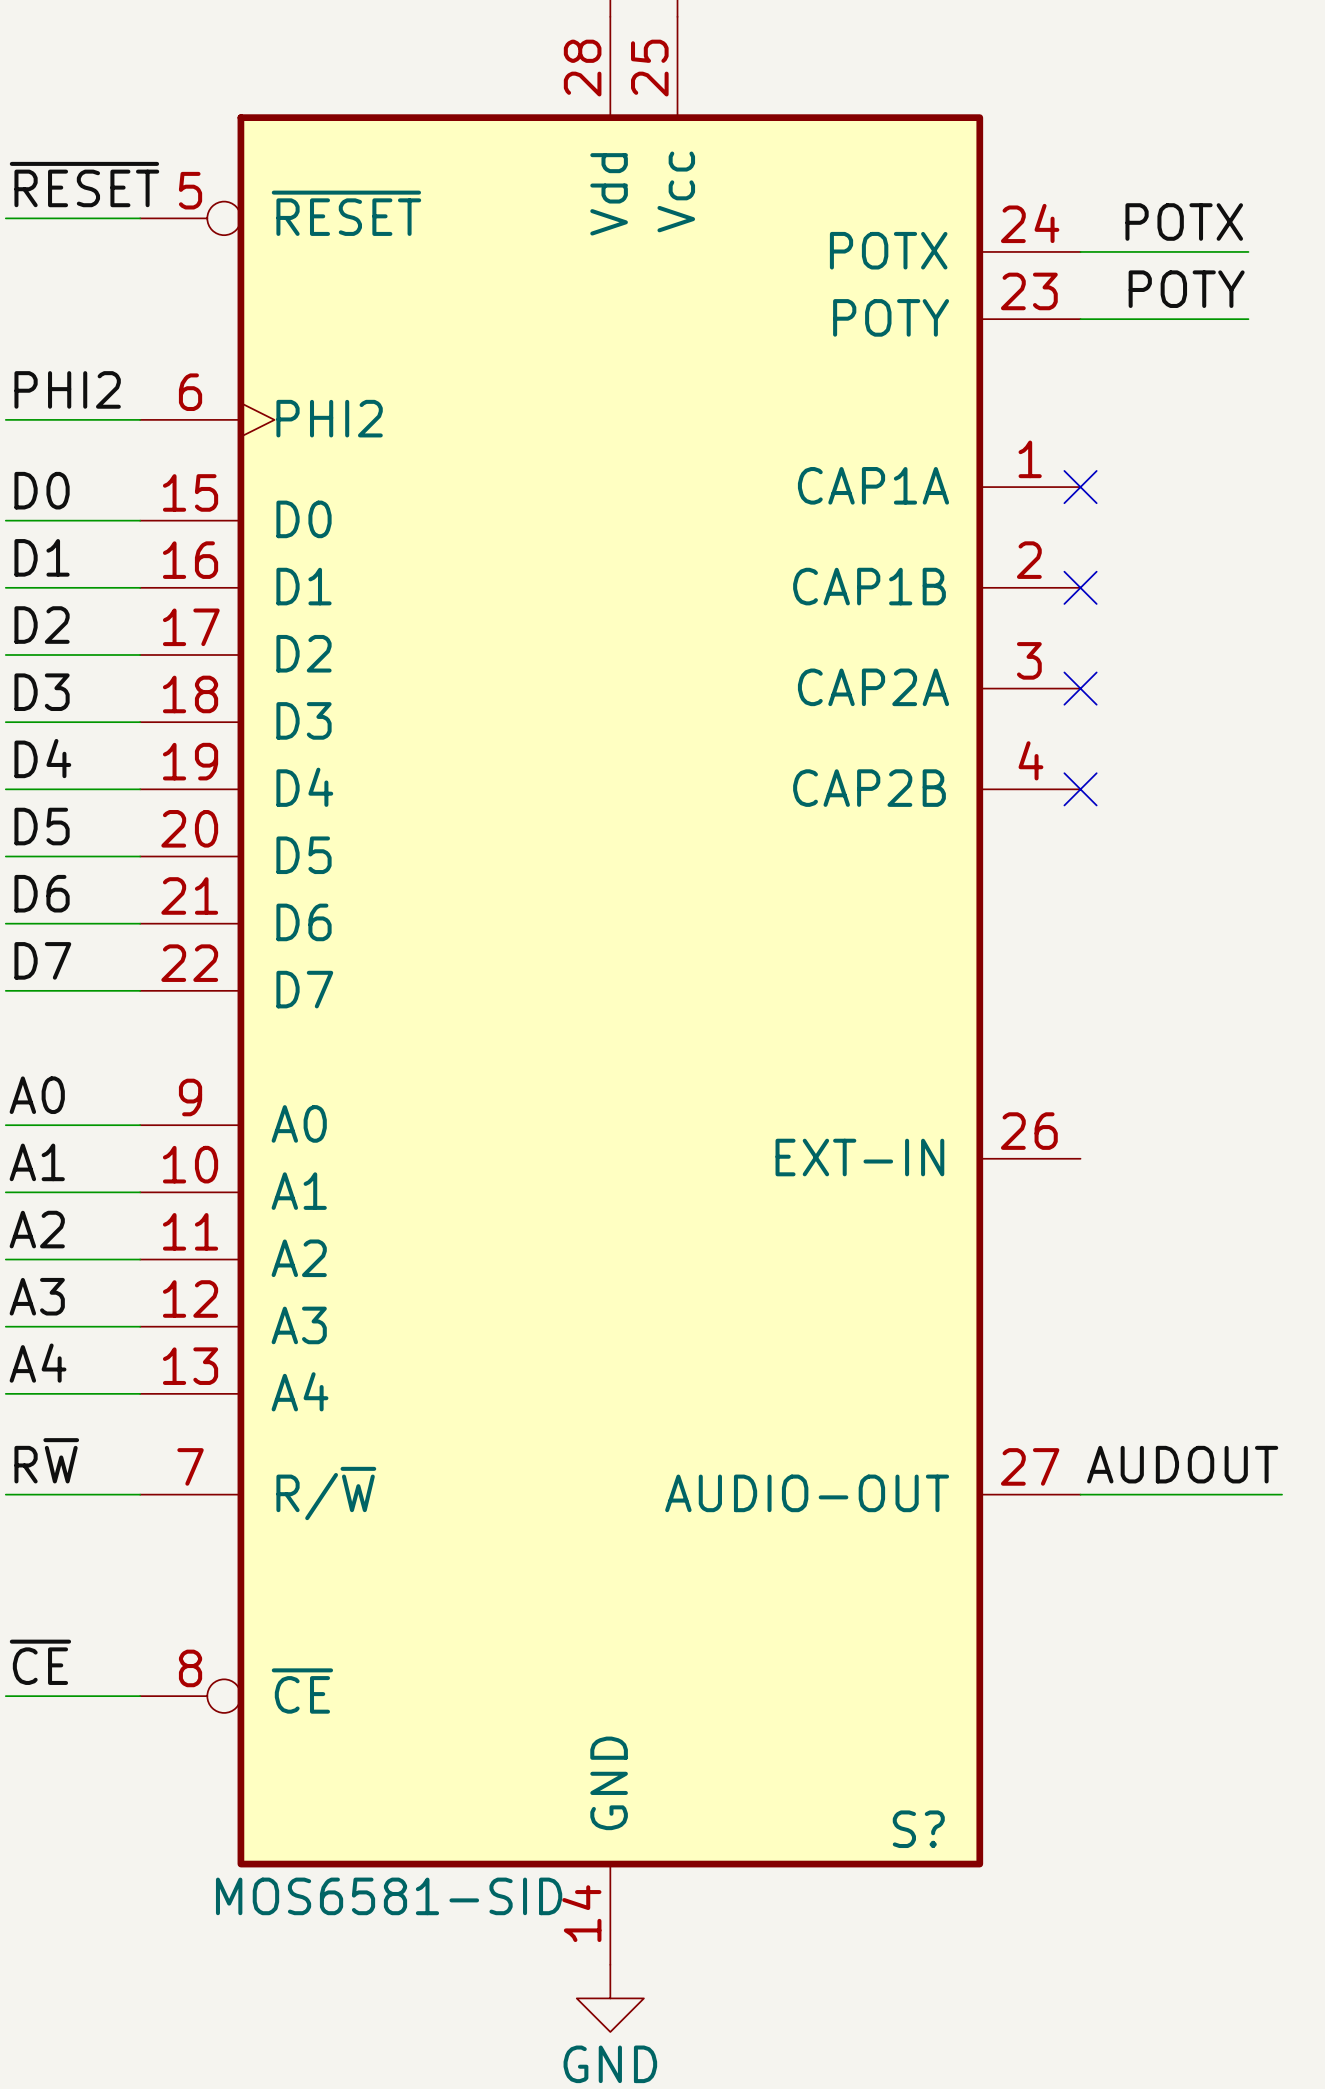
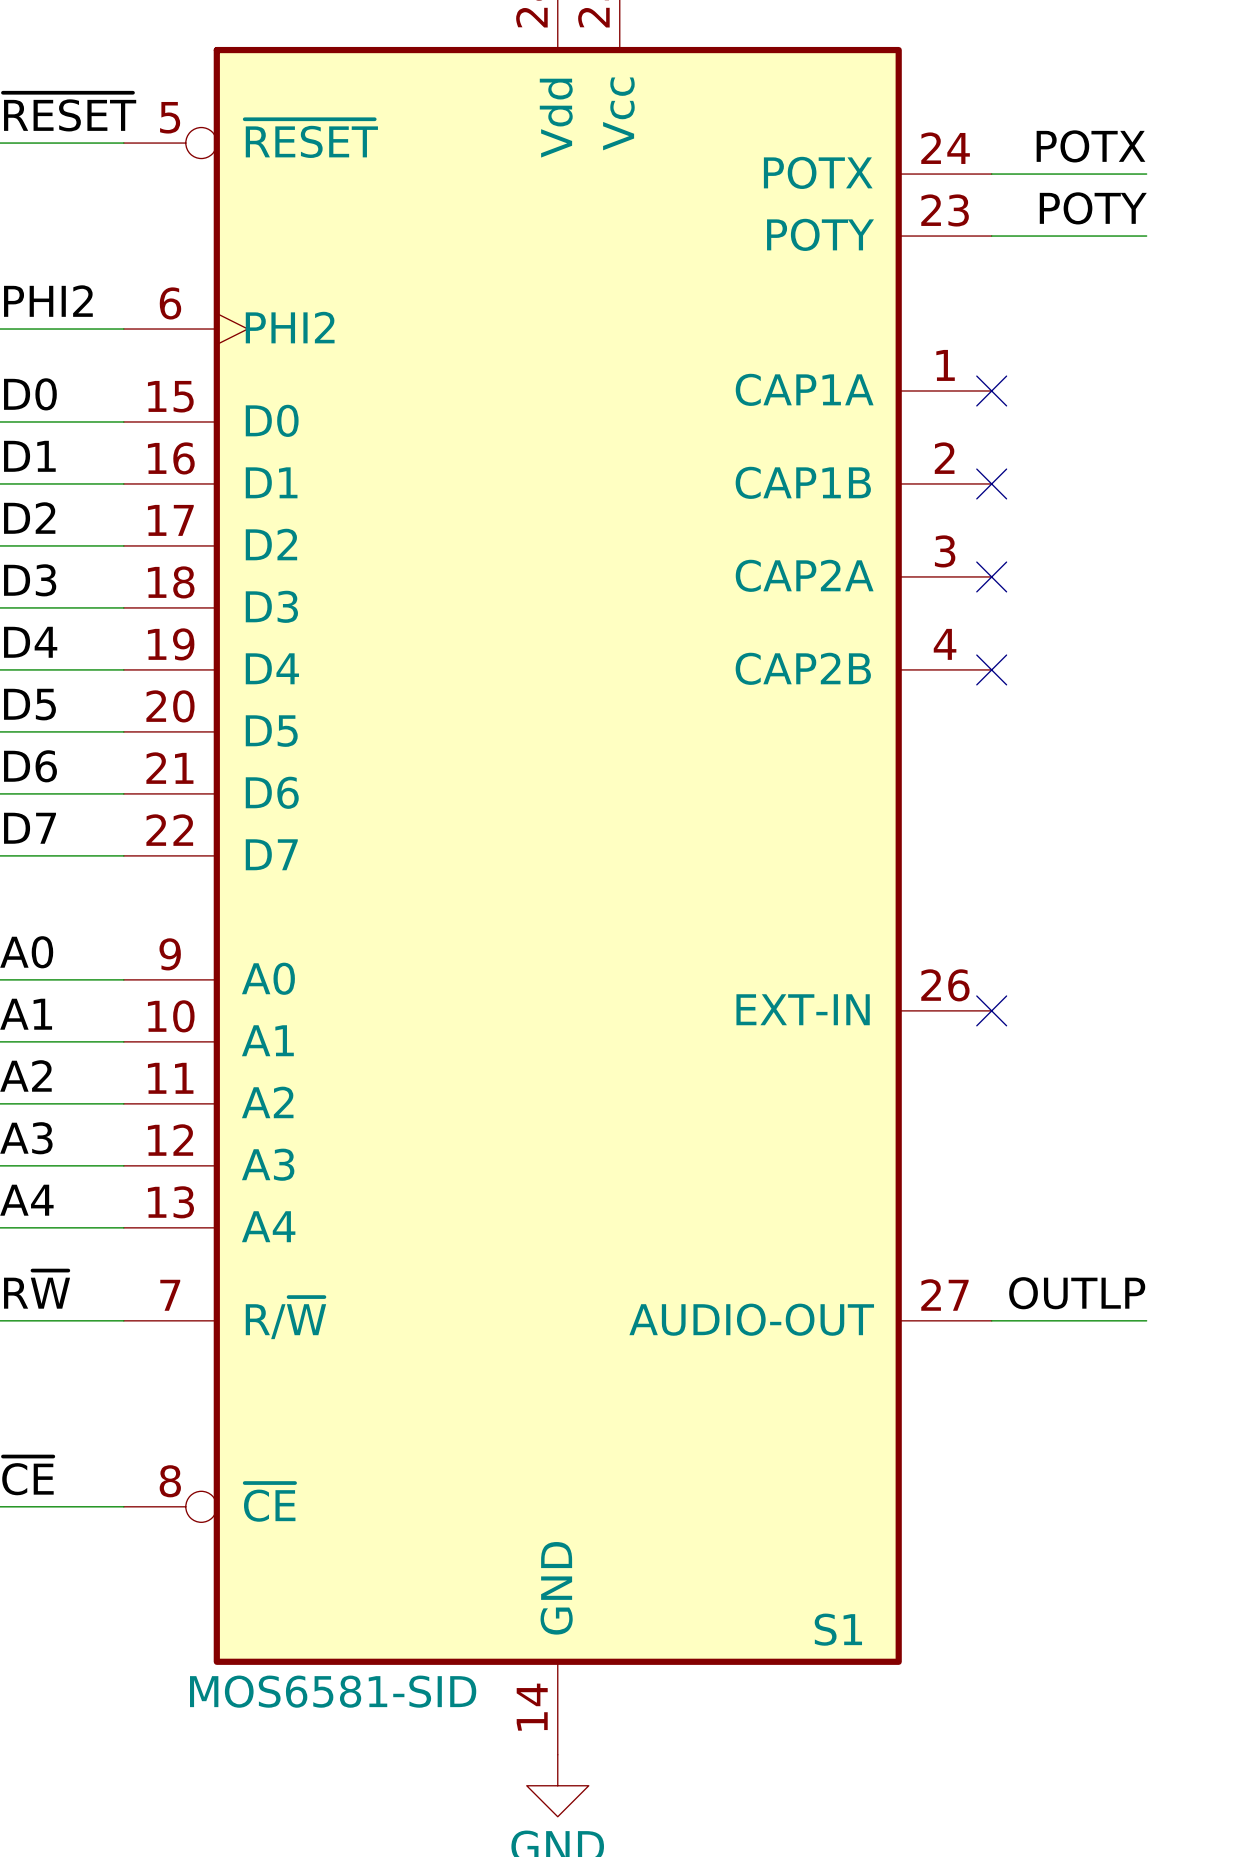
no-connect mark: none -> (991, 1010)
label: none -> OUTLP (1077, 1293)
label: AUDOUT (1182, 1464) -> none
wire: (1248, 1494) (1282, 1494) -> none
S? name: S? (918, 1829) -> S1 (838, 1629)

